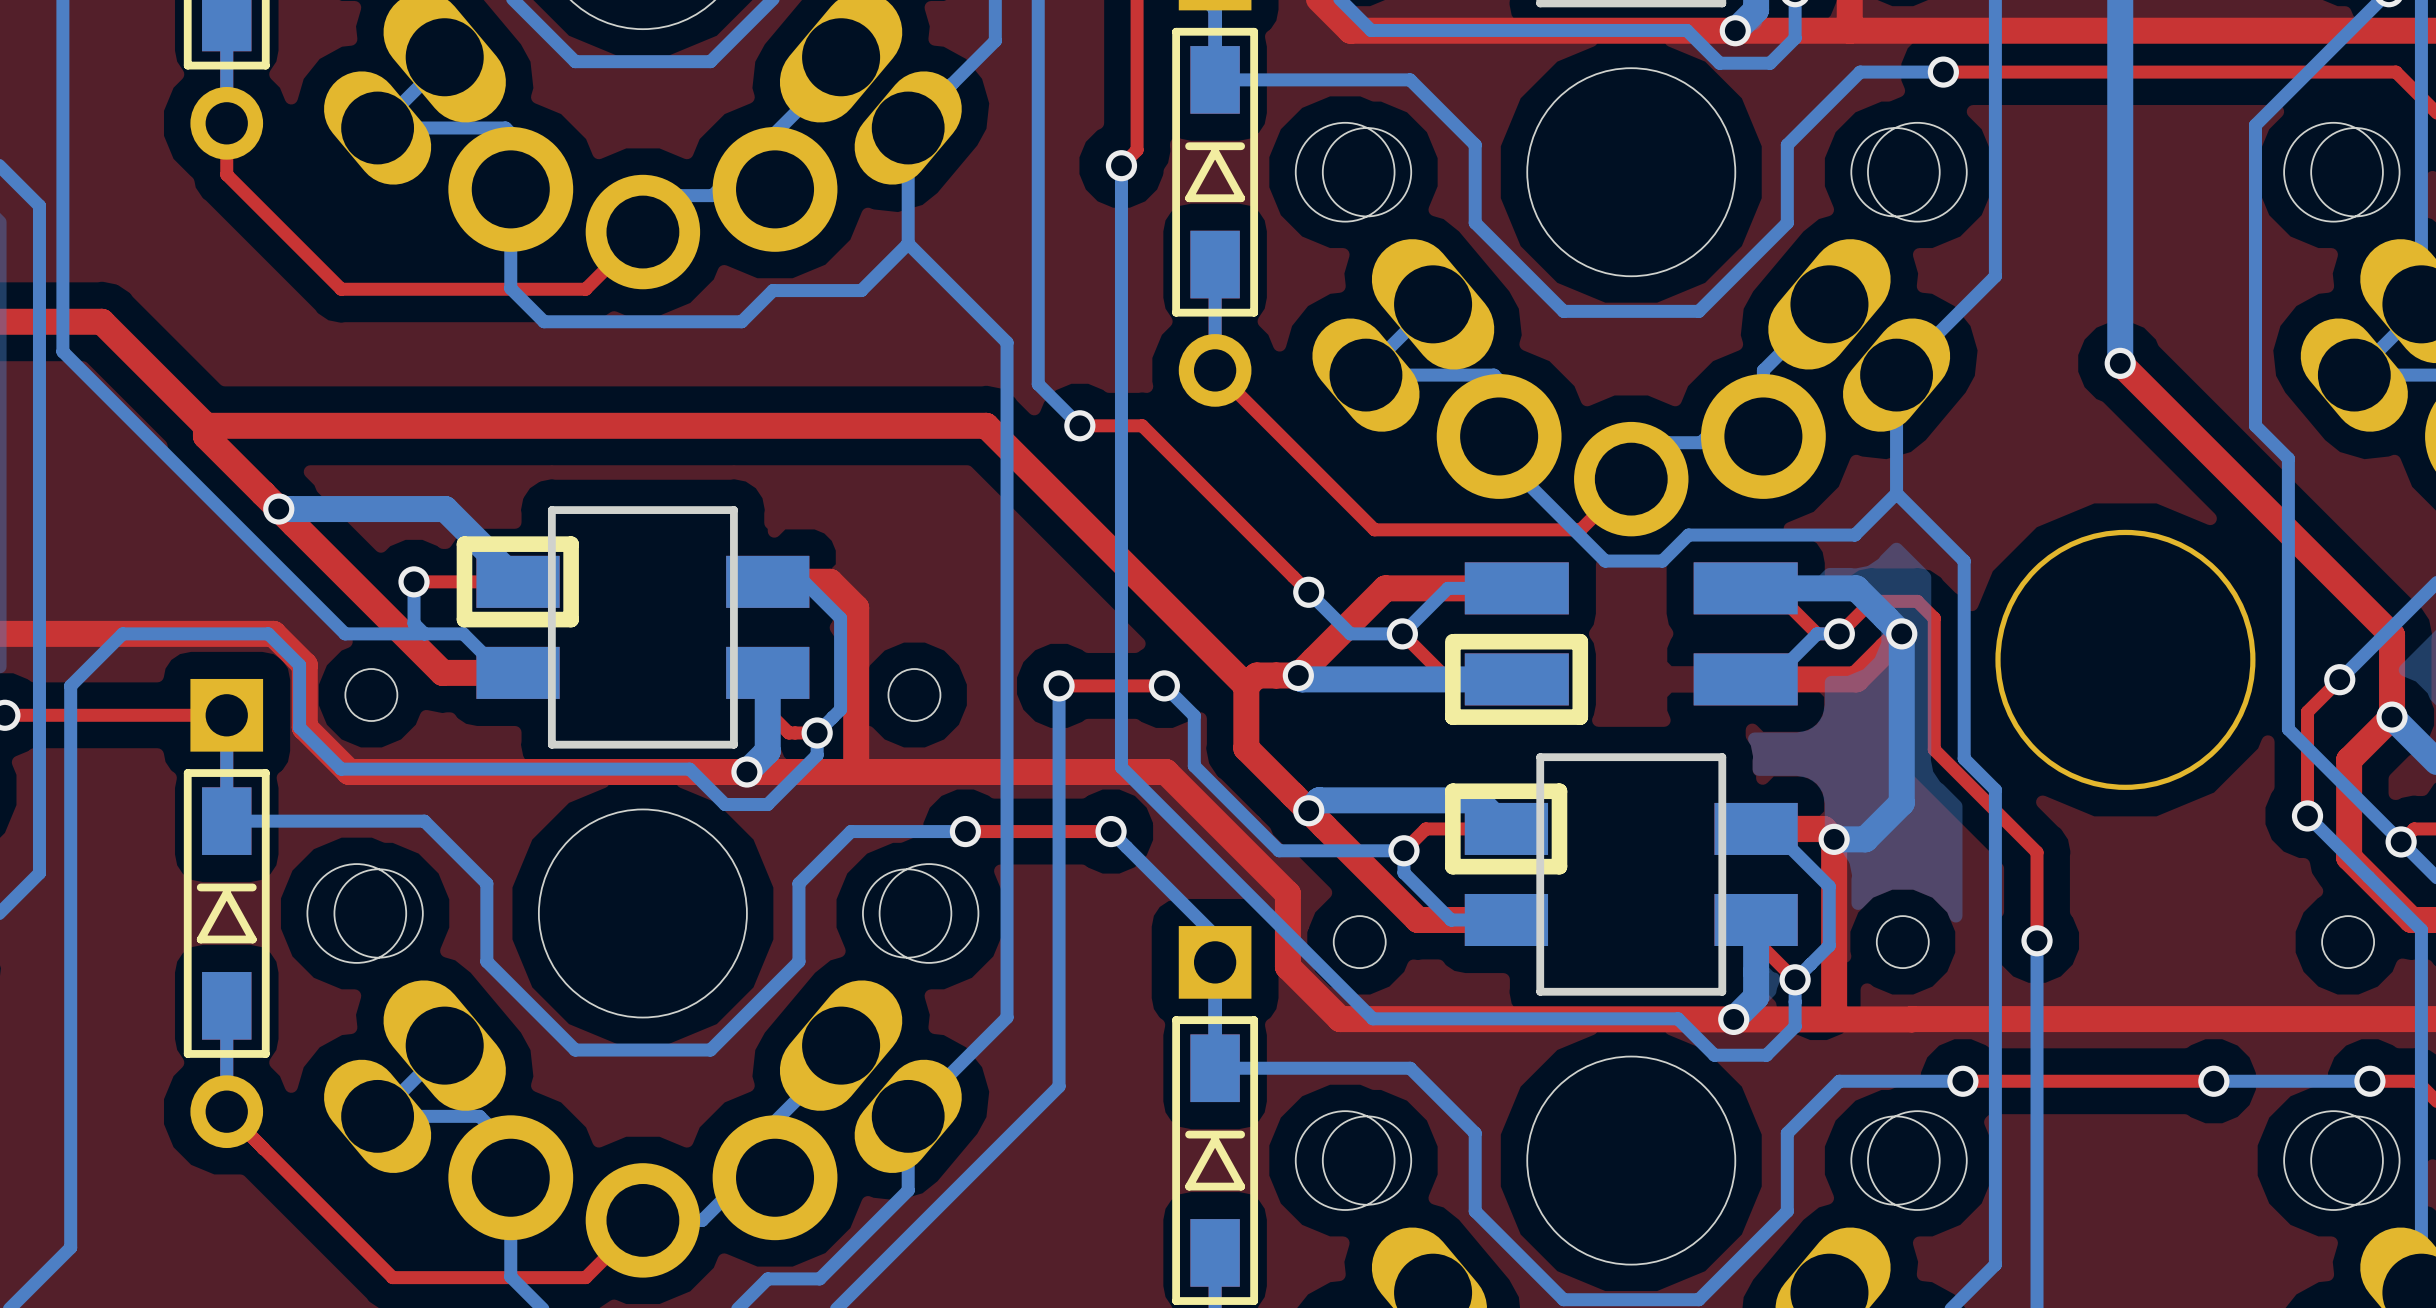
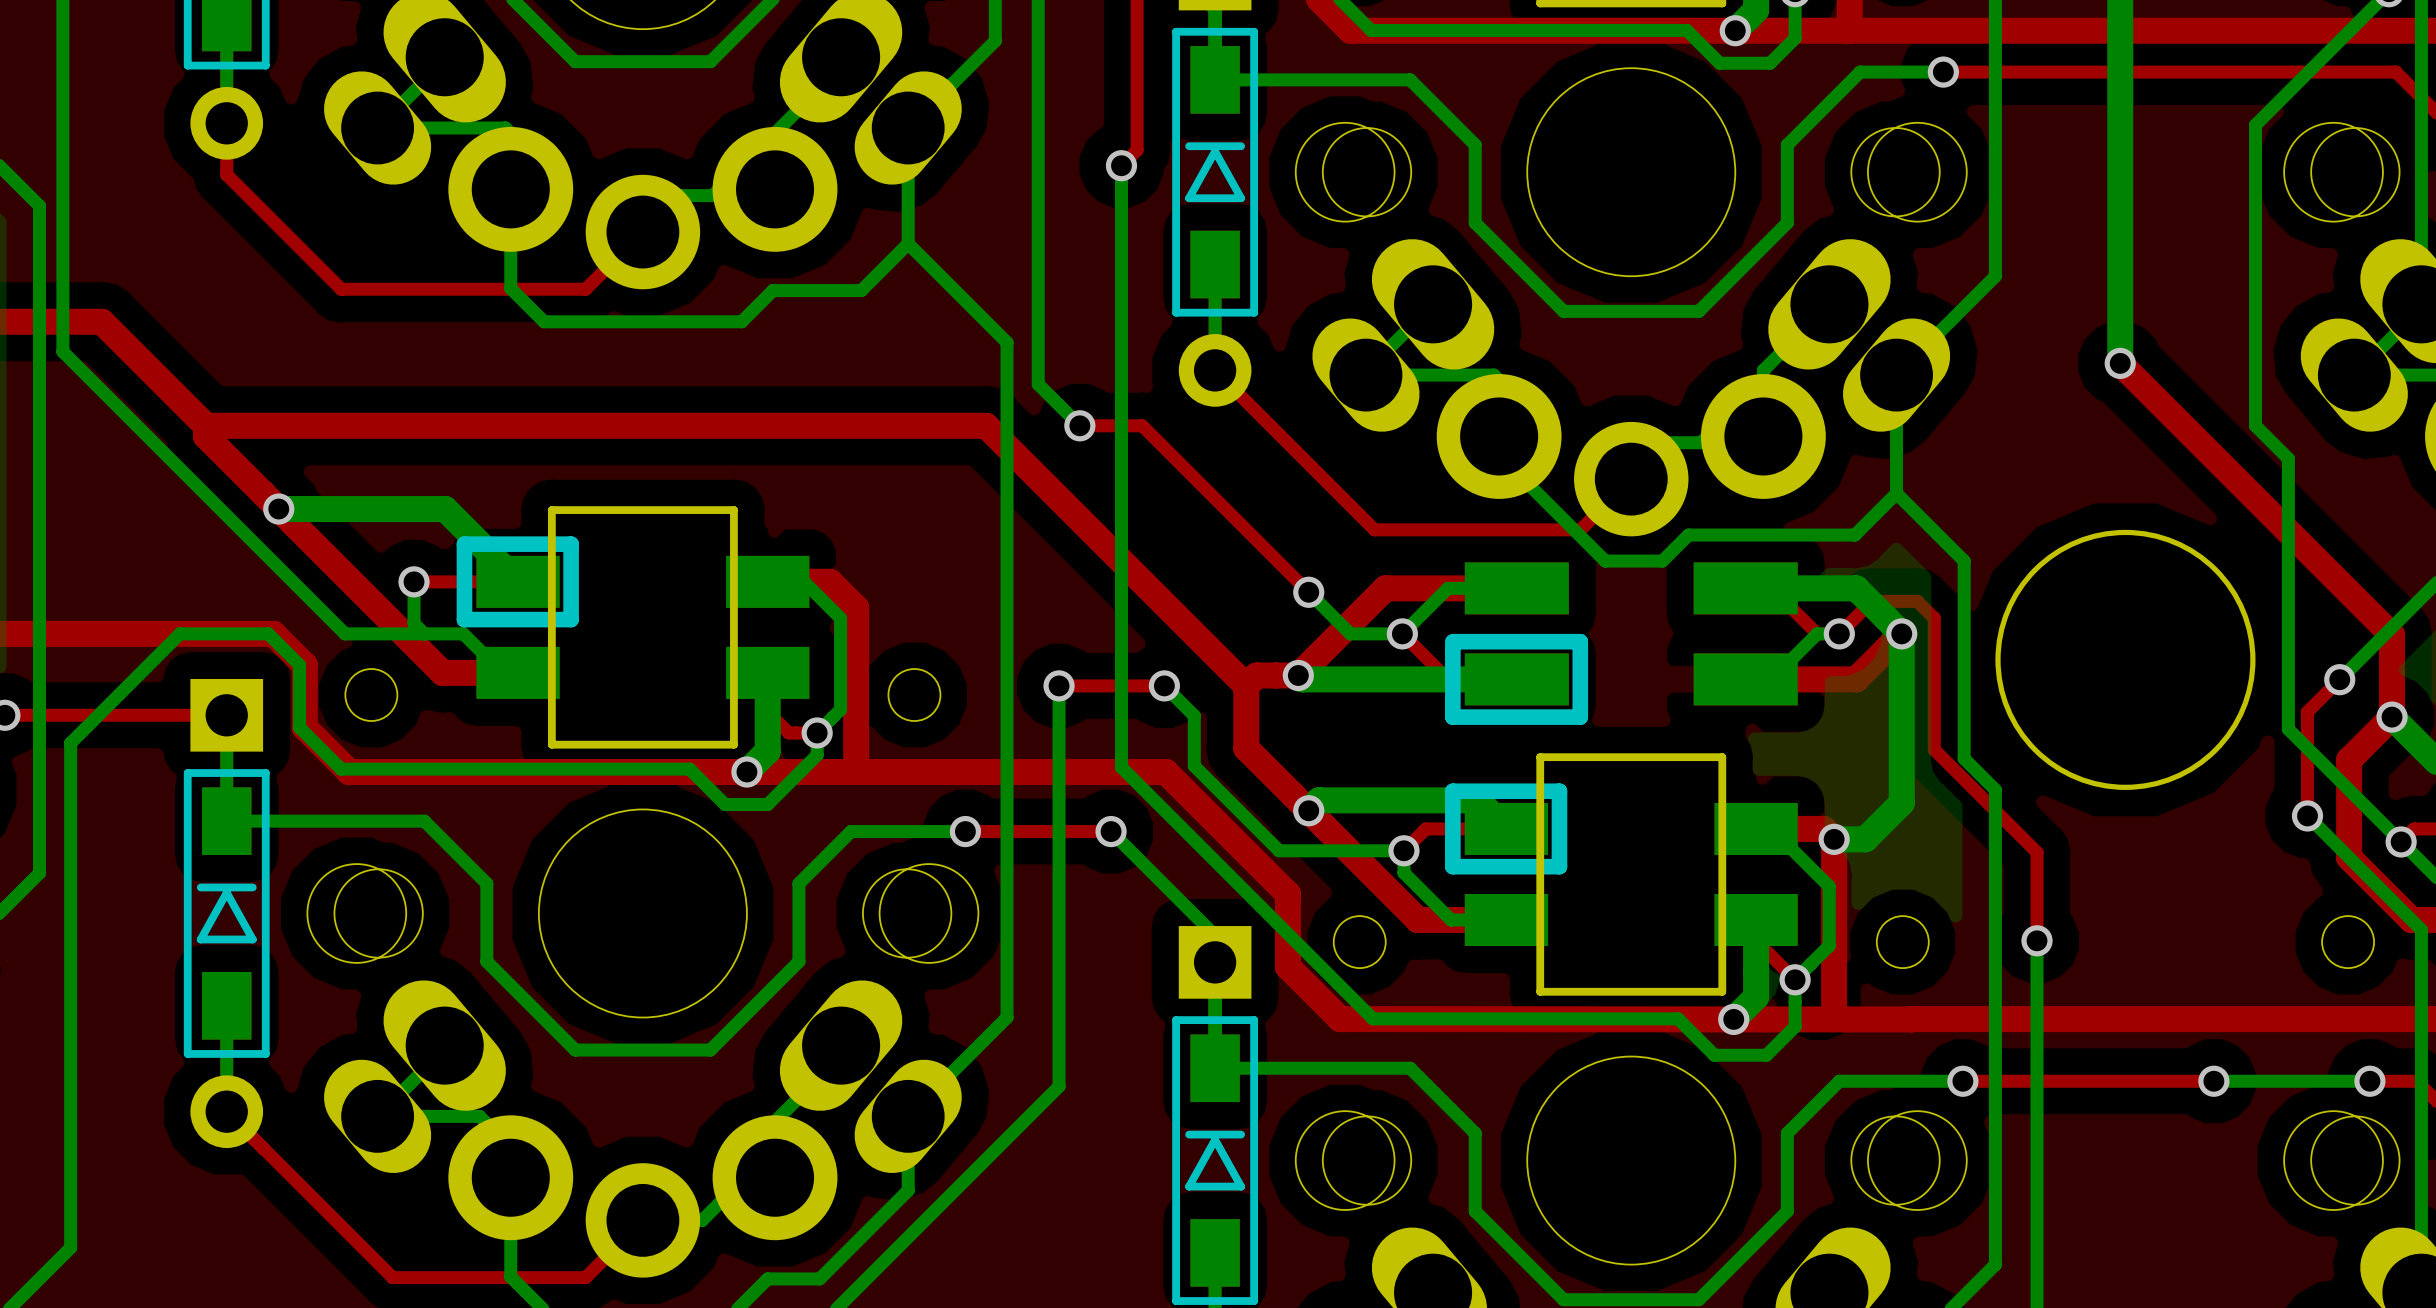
bottom track: (179, 633) (122, 633) (70, 685) (70, 743) -> (179, 633) (70, 743)

